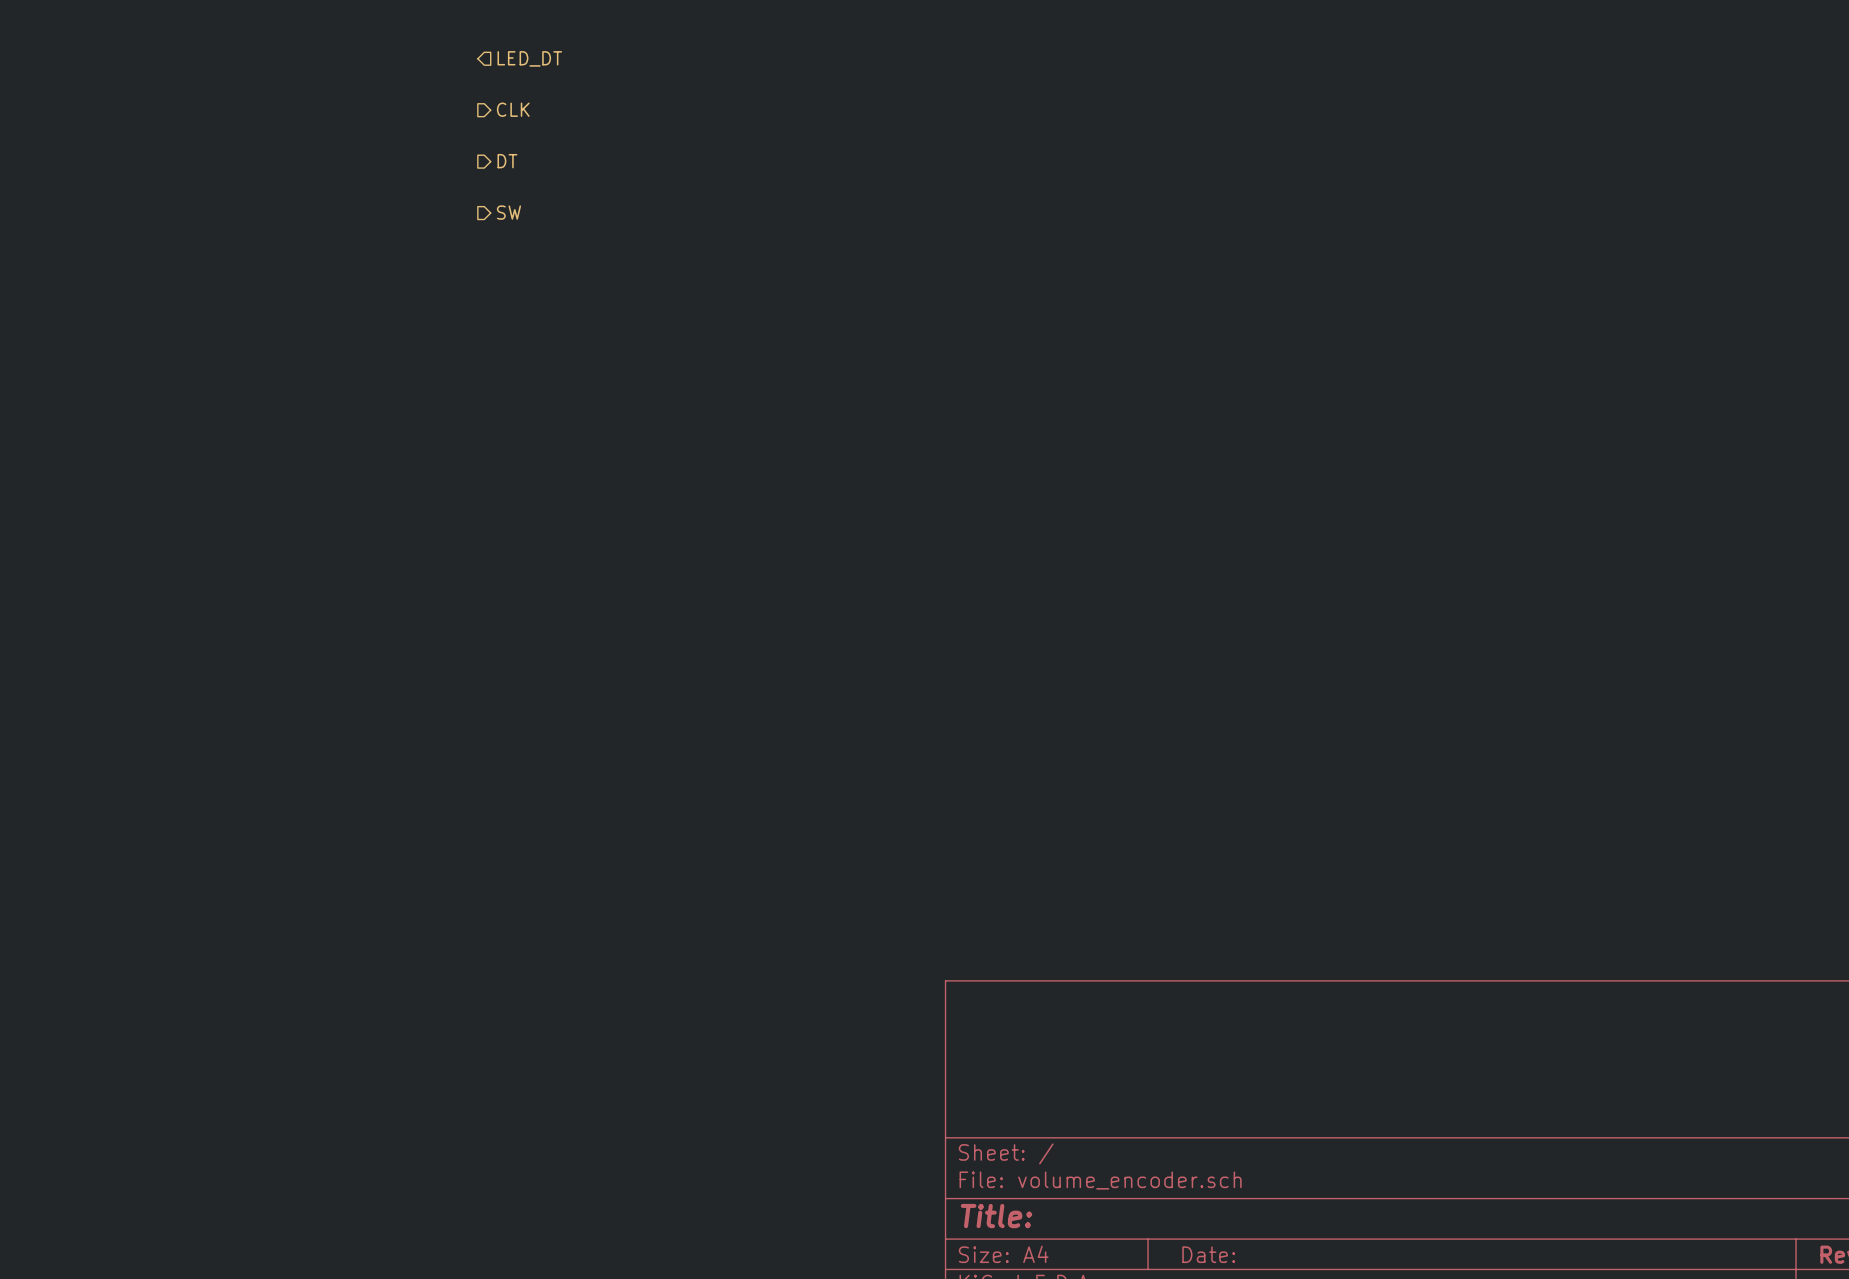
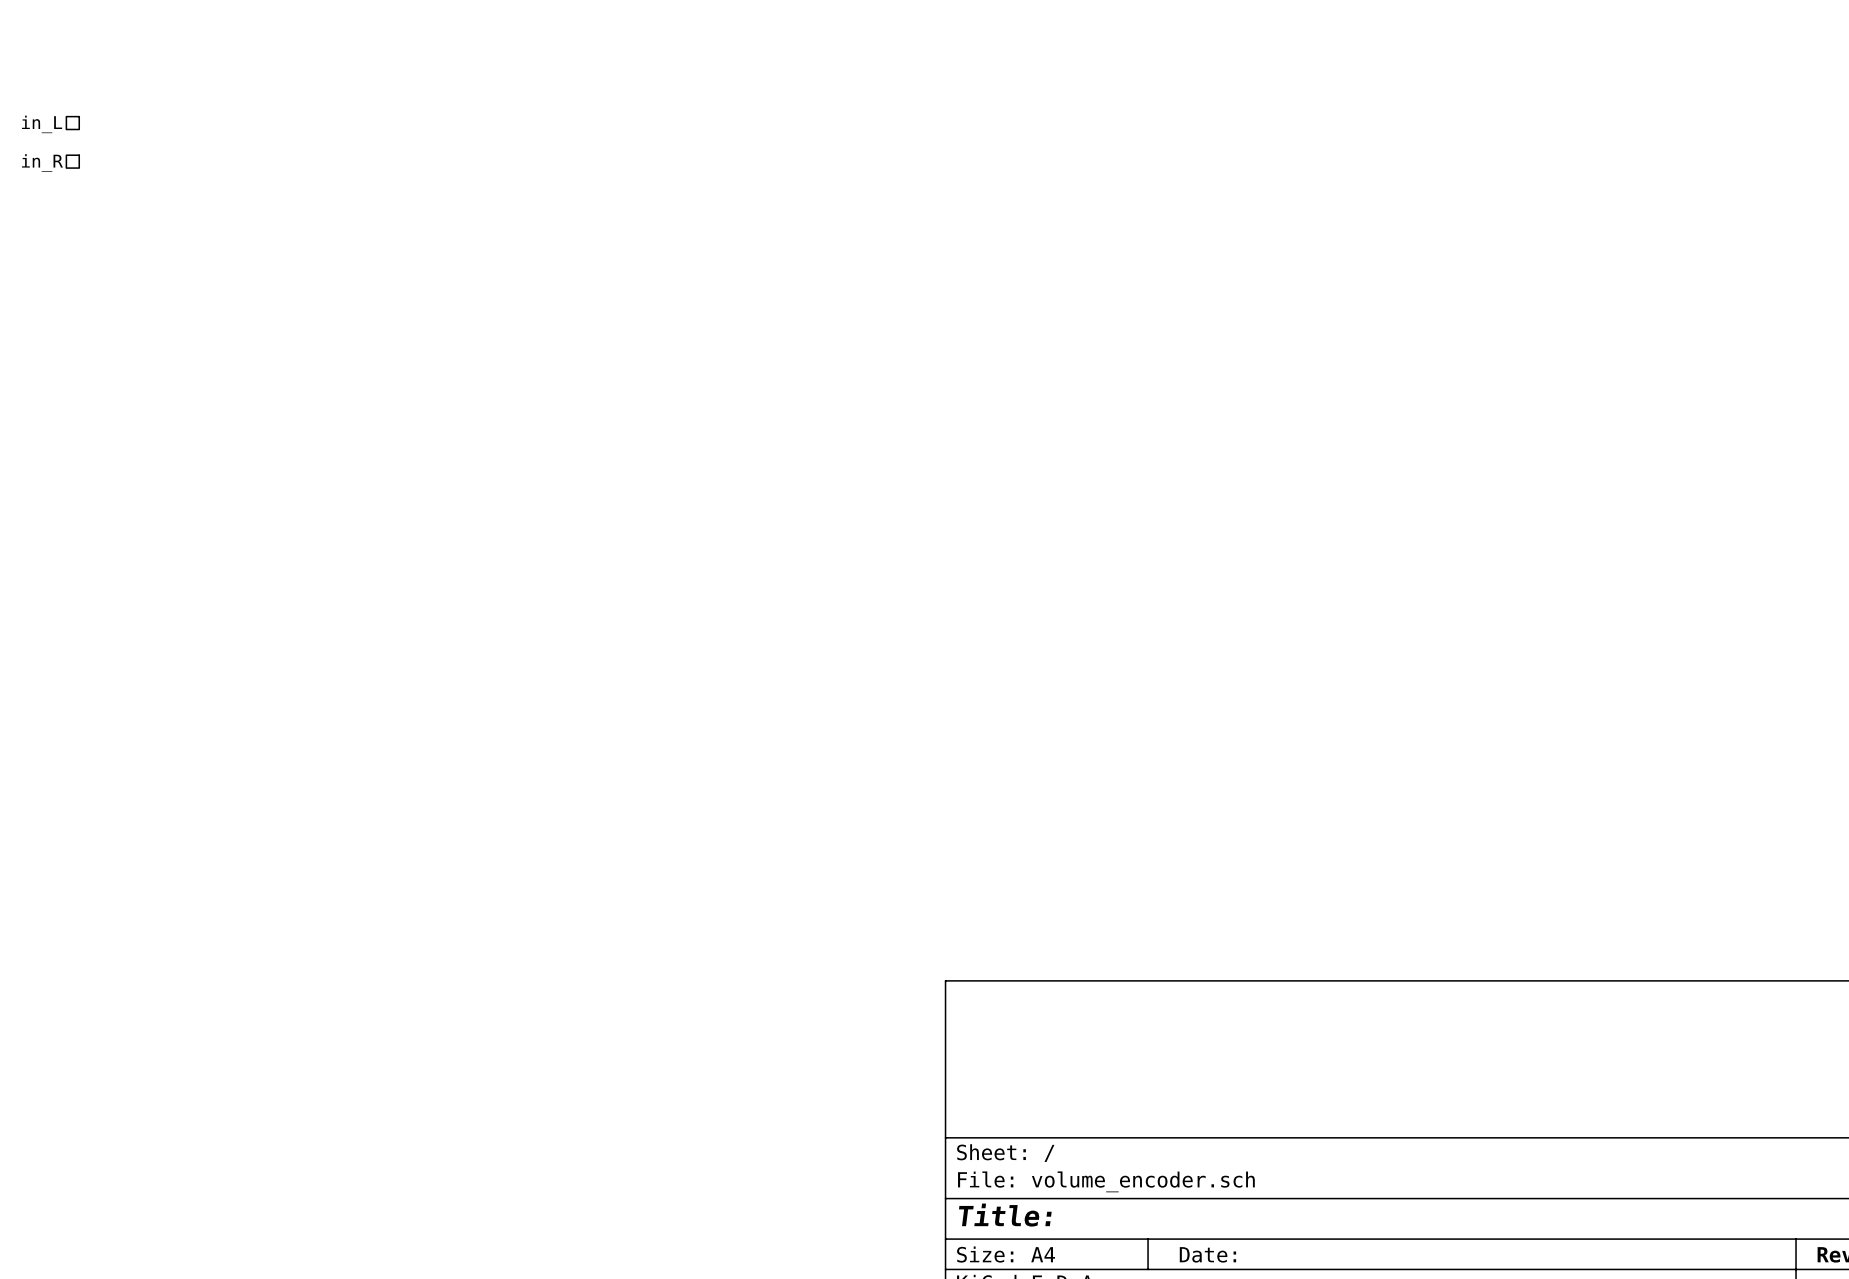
hierarchical label: LED_DT (529, 58) -> none
hierarchical label: CLK (513, 109) -> none
hierarchical label: none -> in_L (42, 124)
hierarchical label: none -> in_R (42, 162)
hierarchical label: DT (507, 161) -> none
hierarchical label: SW (508, 212) -> none

